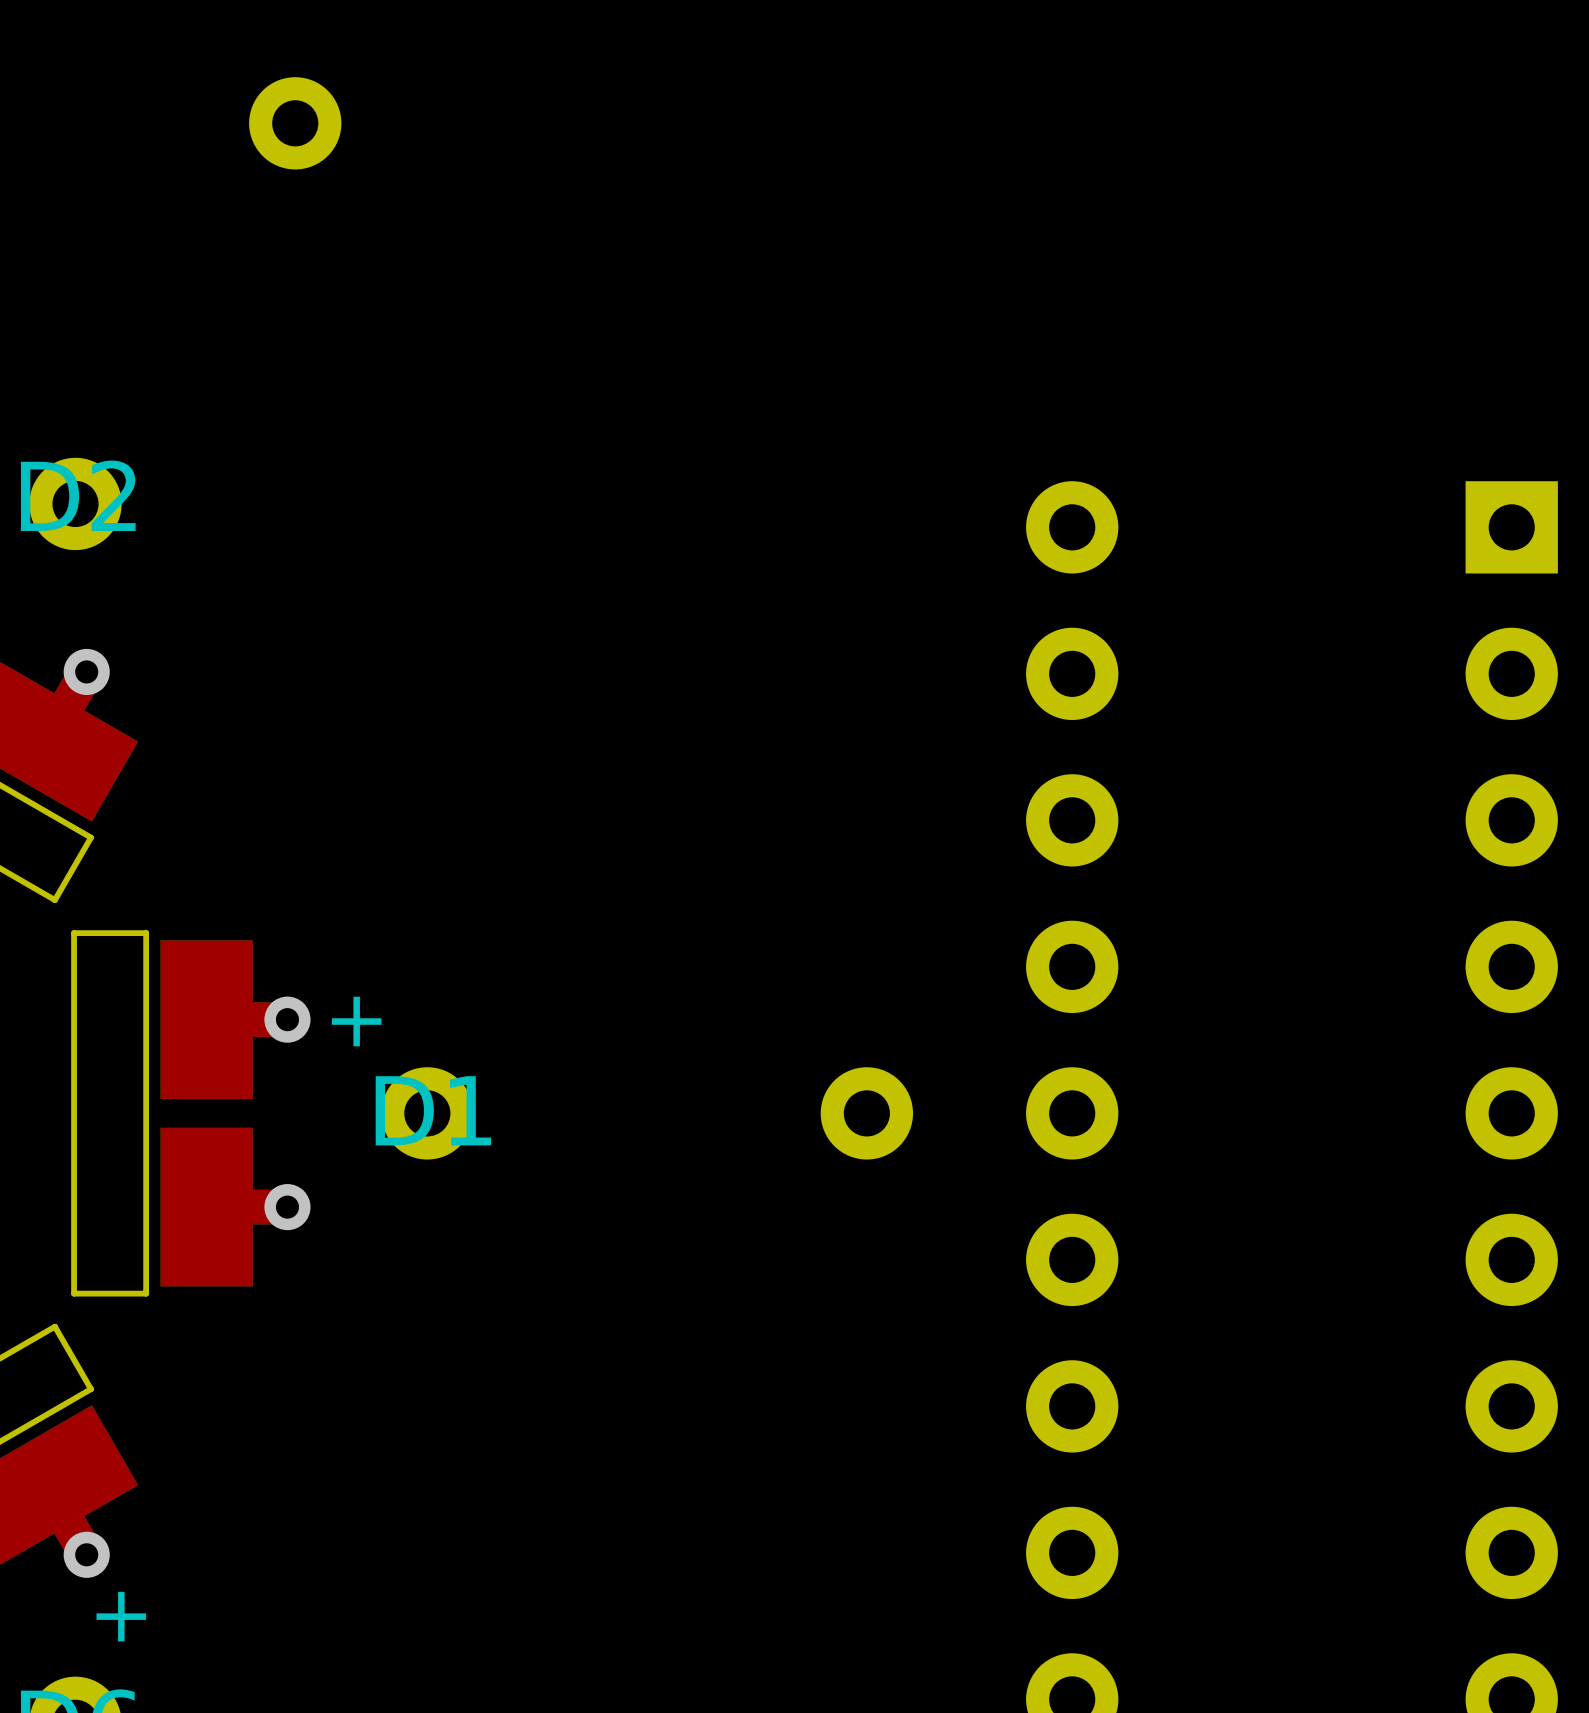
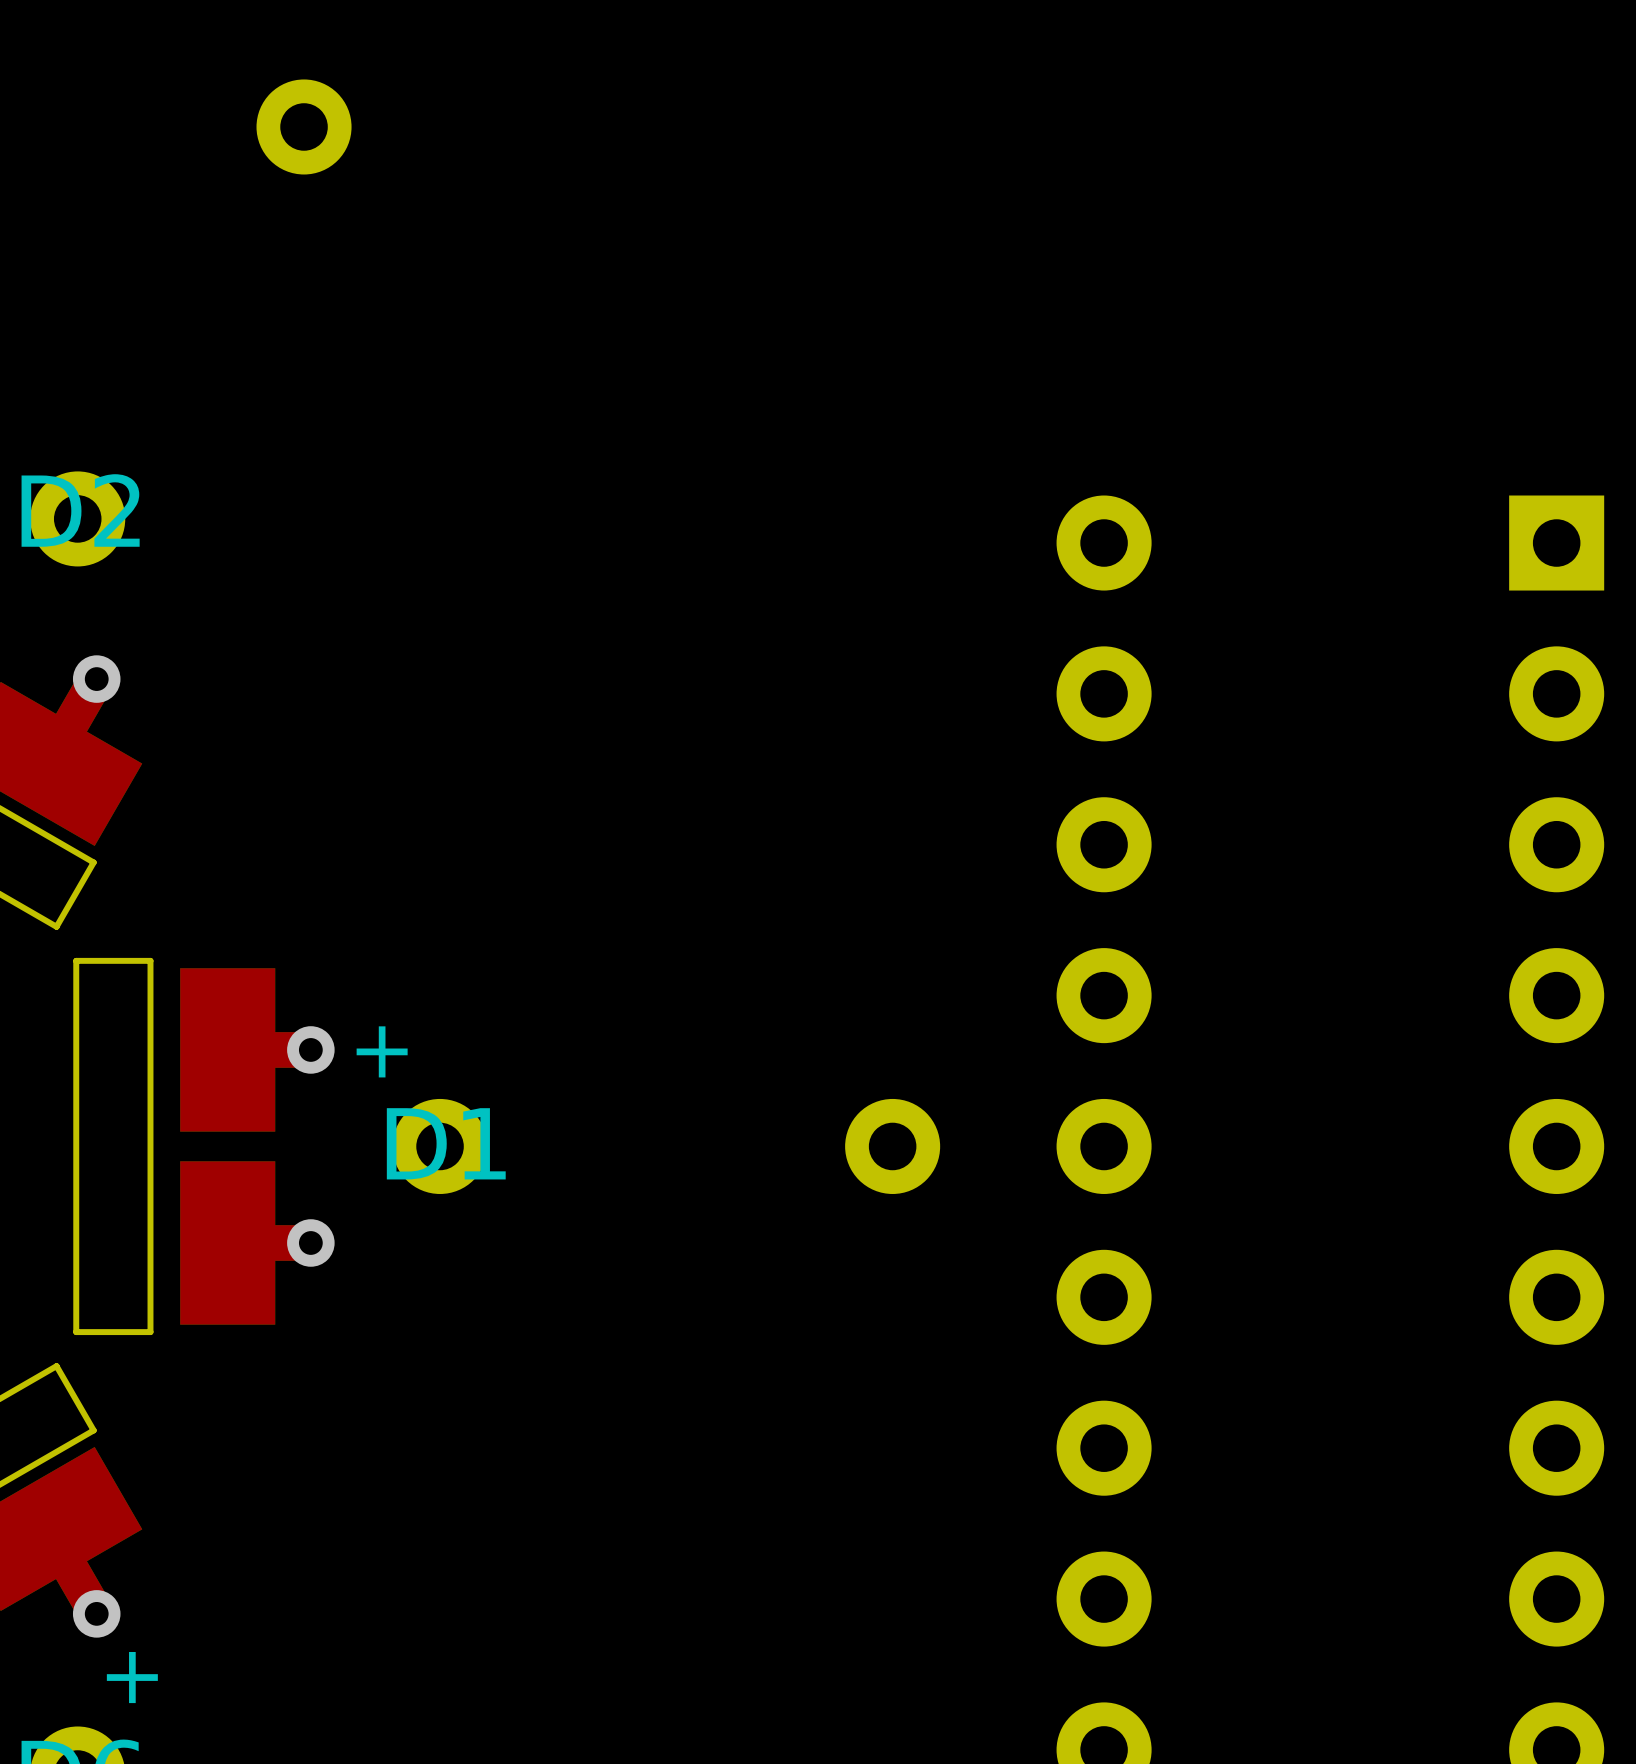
via position: (86, 671) -> (96, 679)
via position: (287, 1019) -> (310, 1049)
text position: + (356, 1021) -> + (382, 1051)
part position: (206, 1113) -> (227, 1146)
via position: (287, 1207) -> (310, 1242)
via position: (86, 1554) -> (96, 1613)
text position: + (121, 1616) -> + (132, 1677)

